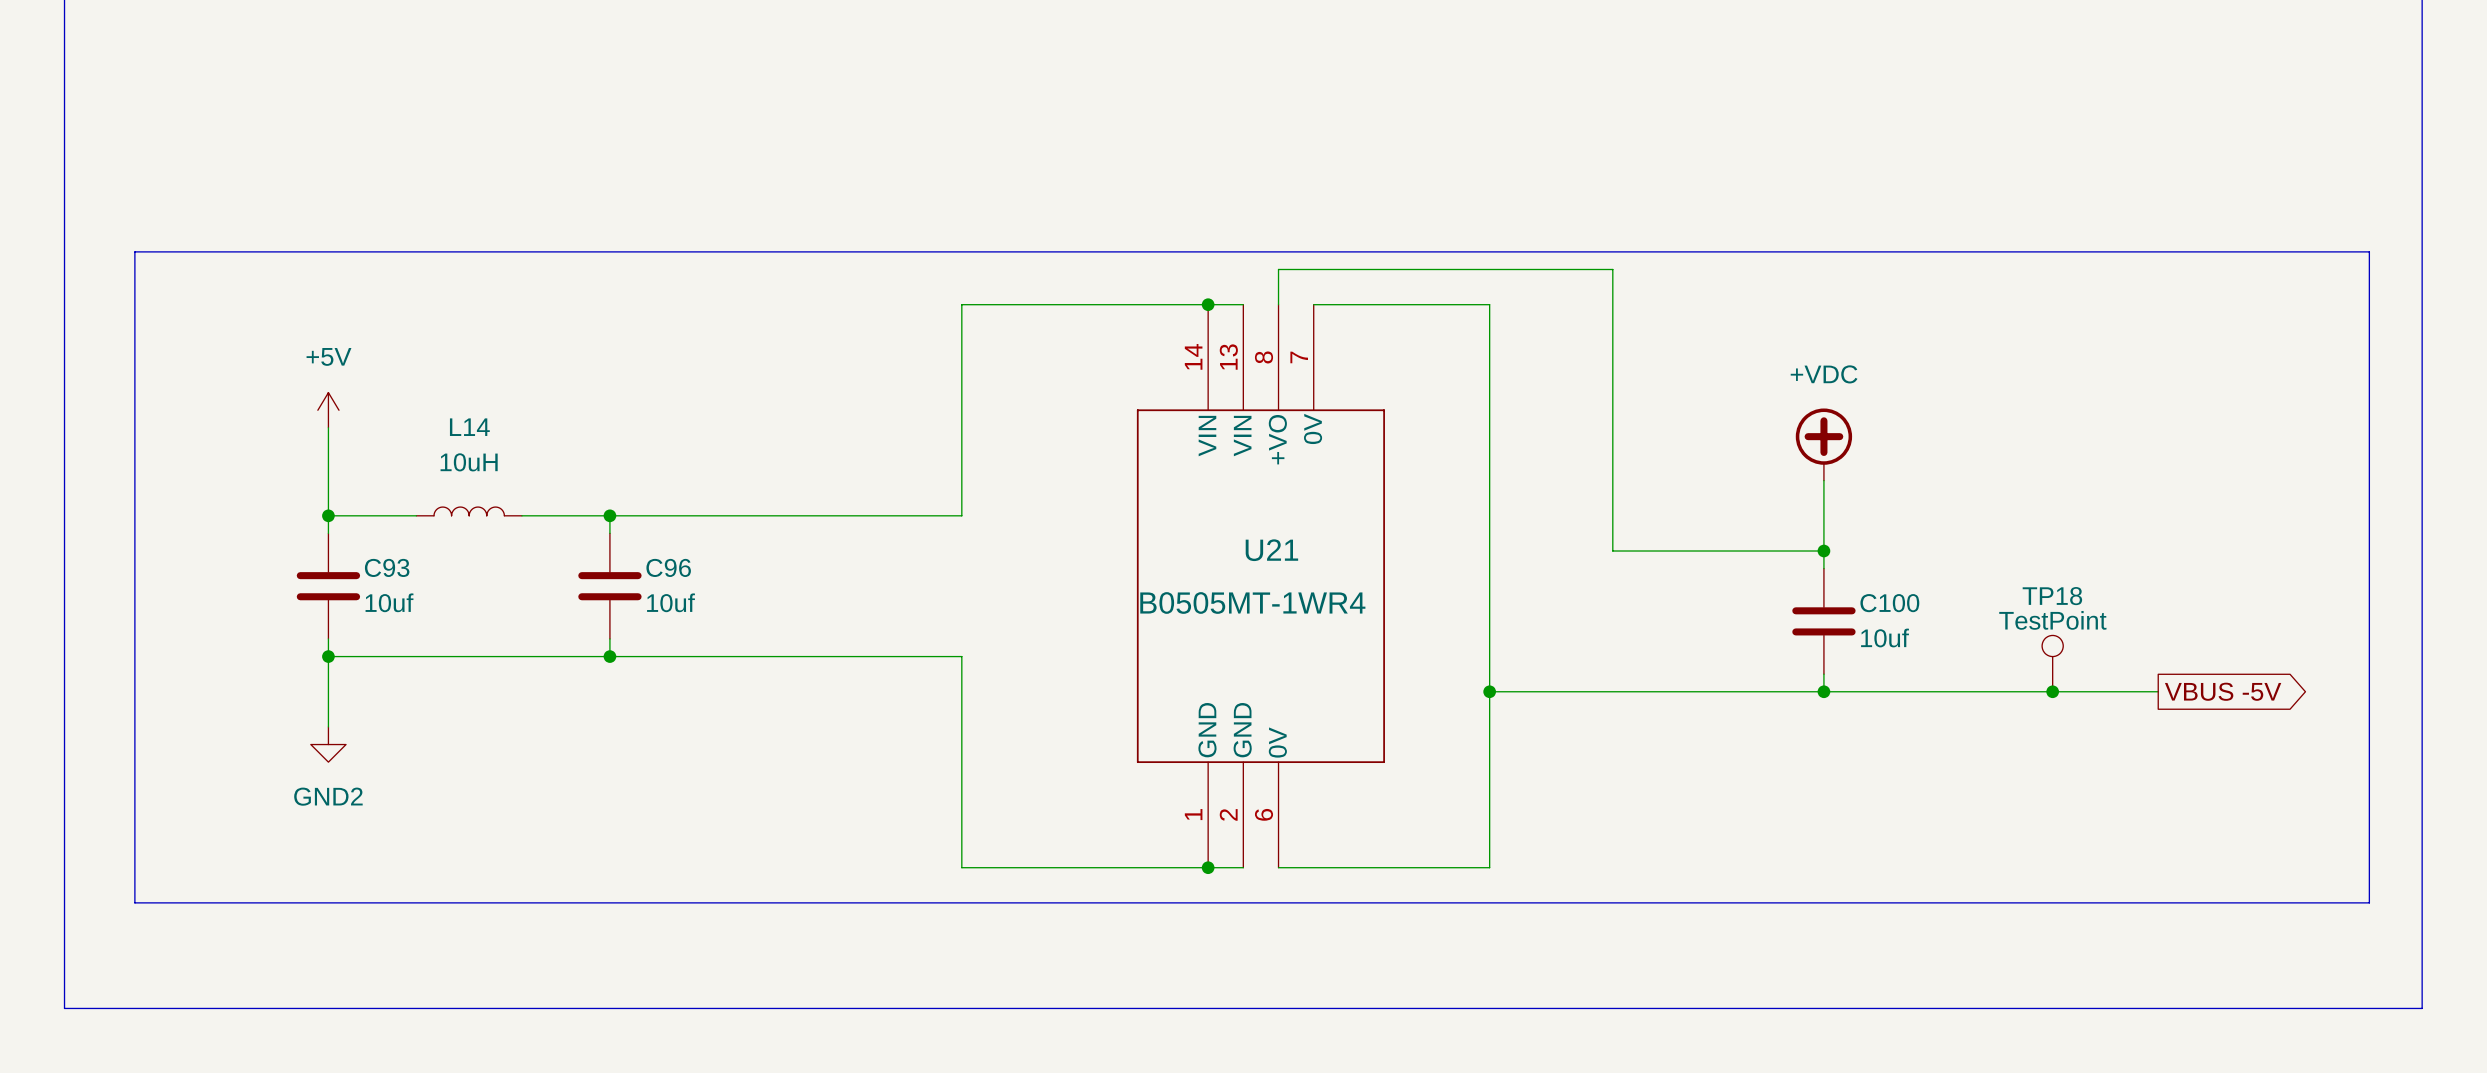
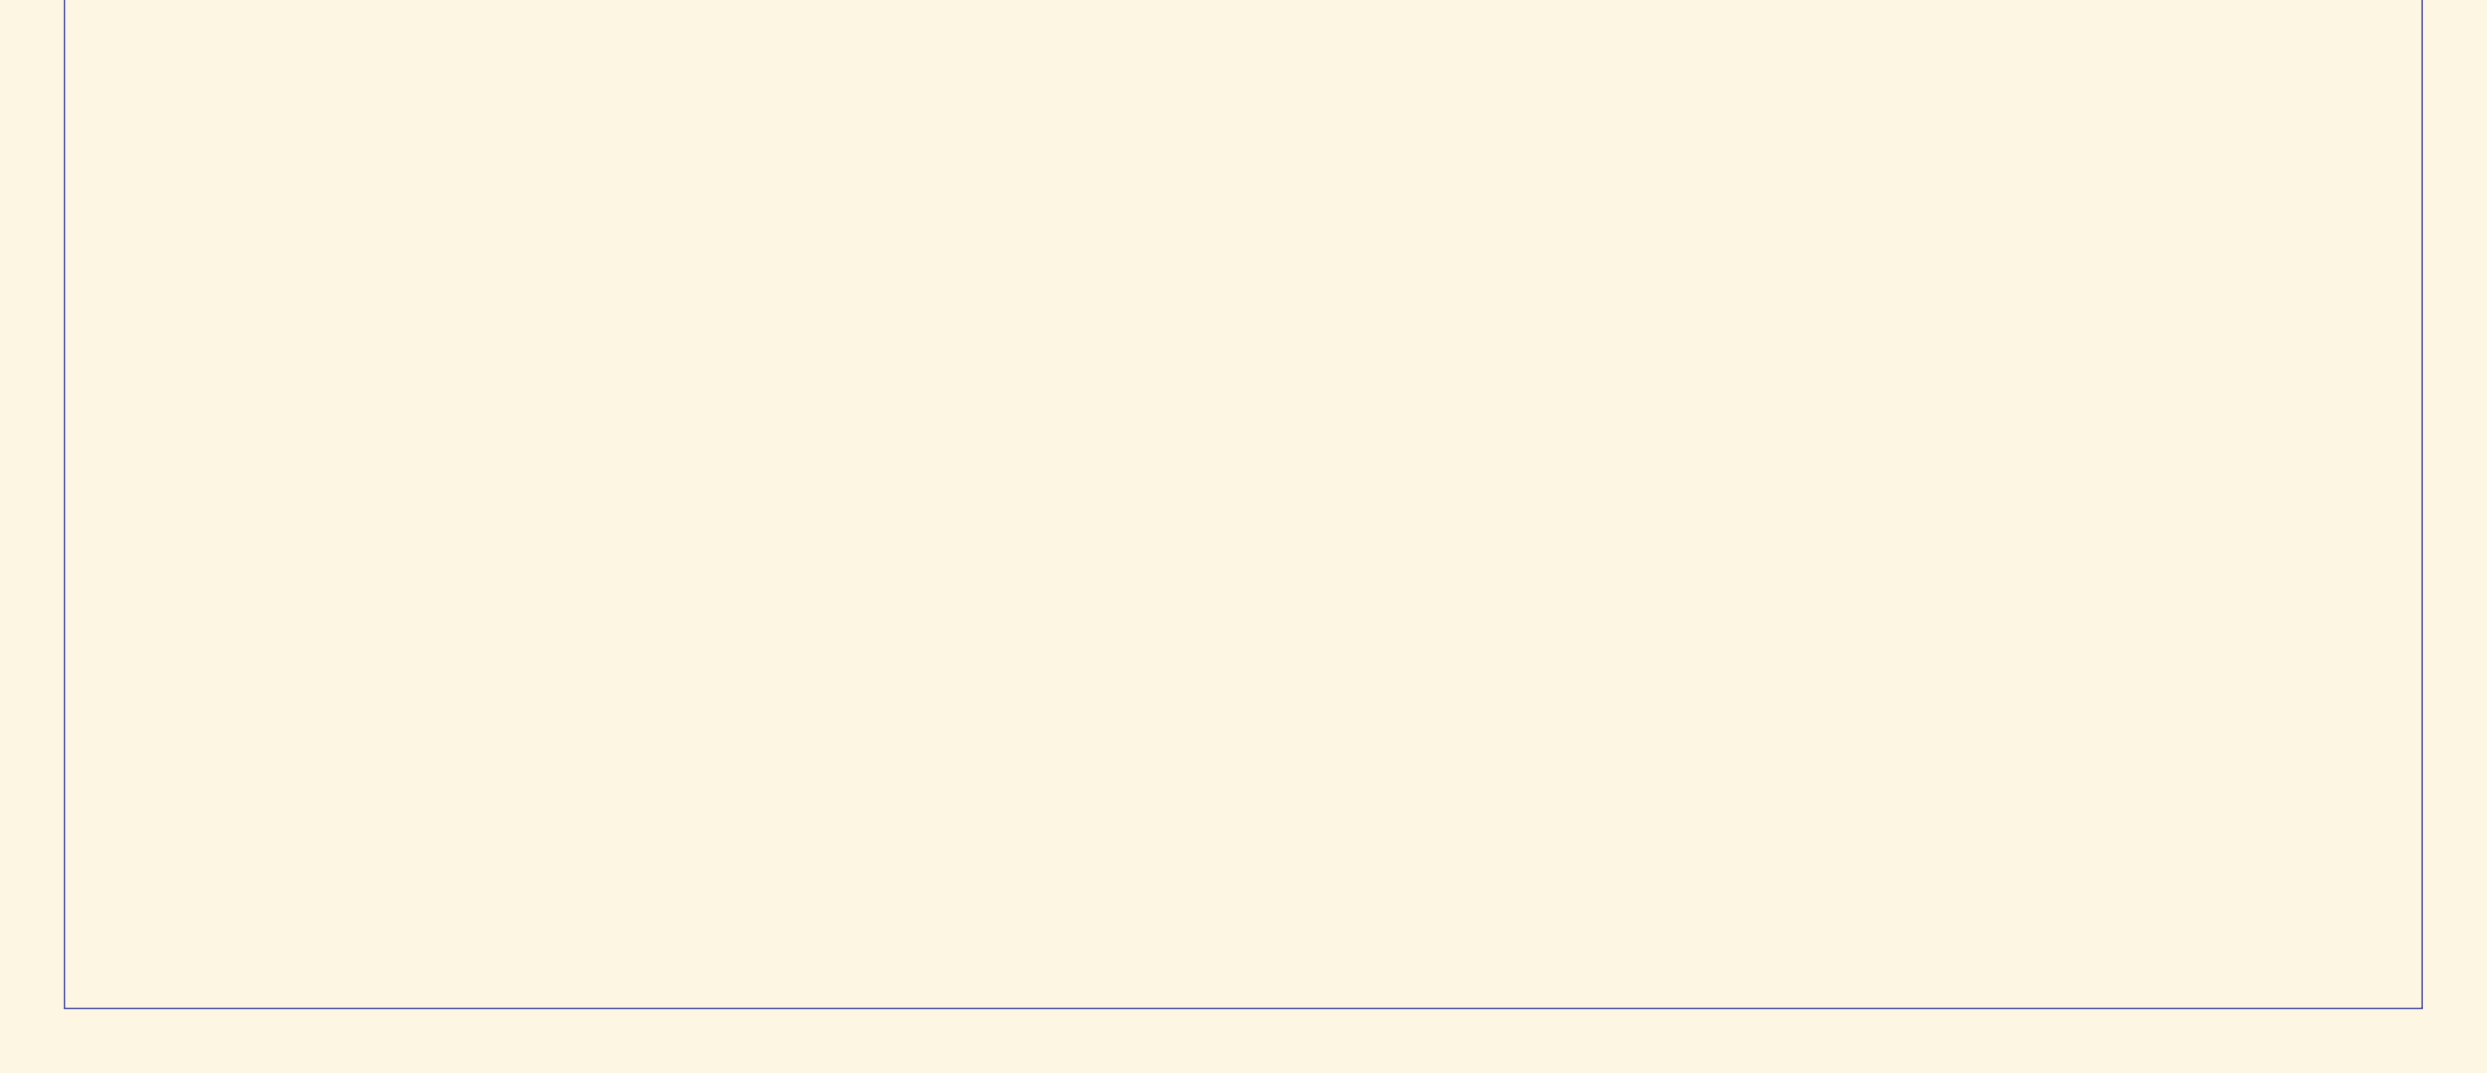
line: (134, 251) (2369, 251) (2369, 902) (134, 902) (134, 251) -> none
junction: (1208, 304) -> none
wire: (1243, 304) (961, 304) (961, 515) (521, 515) -> none
wire: (1278, 304) (1278, 269) (1612, 269) (1612, 551) (1823, 551) -> none
wire: (1313, 304) (1489, 304) (1489, 867) (1278, 867) -> none
power symbol: +5V (328, 410) -> none
wire: (328, 427) (328, 533) -> none
power symbol: +VDC (1823, 444) -> none
wire: (1823, 480) (1823, 568) -> none
L14: 10uH (469, 511) -> none
wire: (328, 515) (416, 515) -> none
junction: (328, 515) -> none
wire: (609, 515) (609, 533) -> none
junction: (609, 515) -> none
junction: (1823, 551) -> none
C93: 10uf (328, 586) -> none
C96: 10uf (609, 586) -> none
U21: B0505MT-1WR4 (1260, 586) -> none
C100: 10uf (1823, 621) -> none
wire: (328, 638) (328, 726) -> none
wire: (609, 638) (609, 656) -> none
wire: (328, 656) (961, 656) (961, 867) (1243, 867) -> none
junction: (328, 656) -> none
junction: (609, 656) -> none
TP18: TestPoint (2052, 663) -> none
wire: (1823, 674) (1823, 691) -> none
wire: (1489, 691) (2158, 691) -> none
junction: (1489, 691) -> none
junction: (1823, 691) -> none
junction: (2052, 691) -> none
global label: VBUS -5V (2223, 691) -> none
power symbol: GND2 (328, 744) -> none
junction: (1208, 867) -> none

